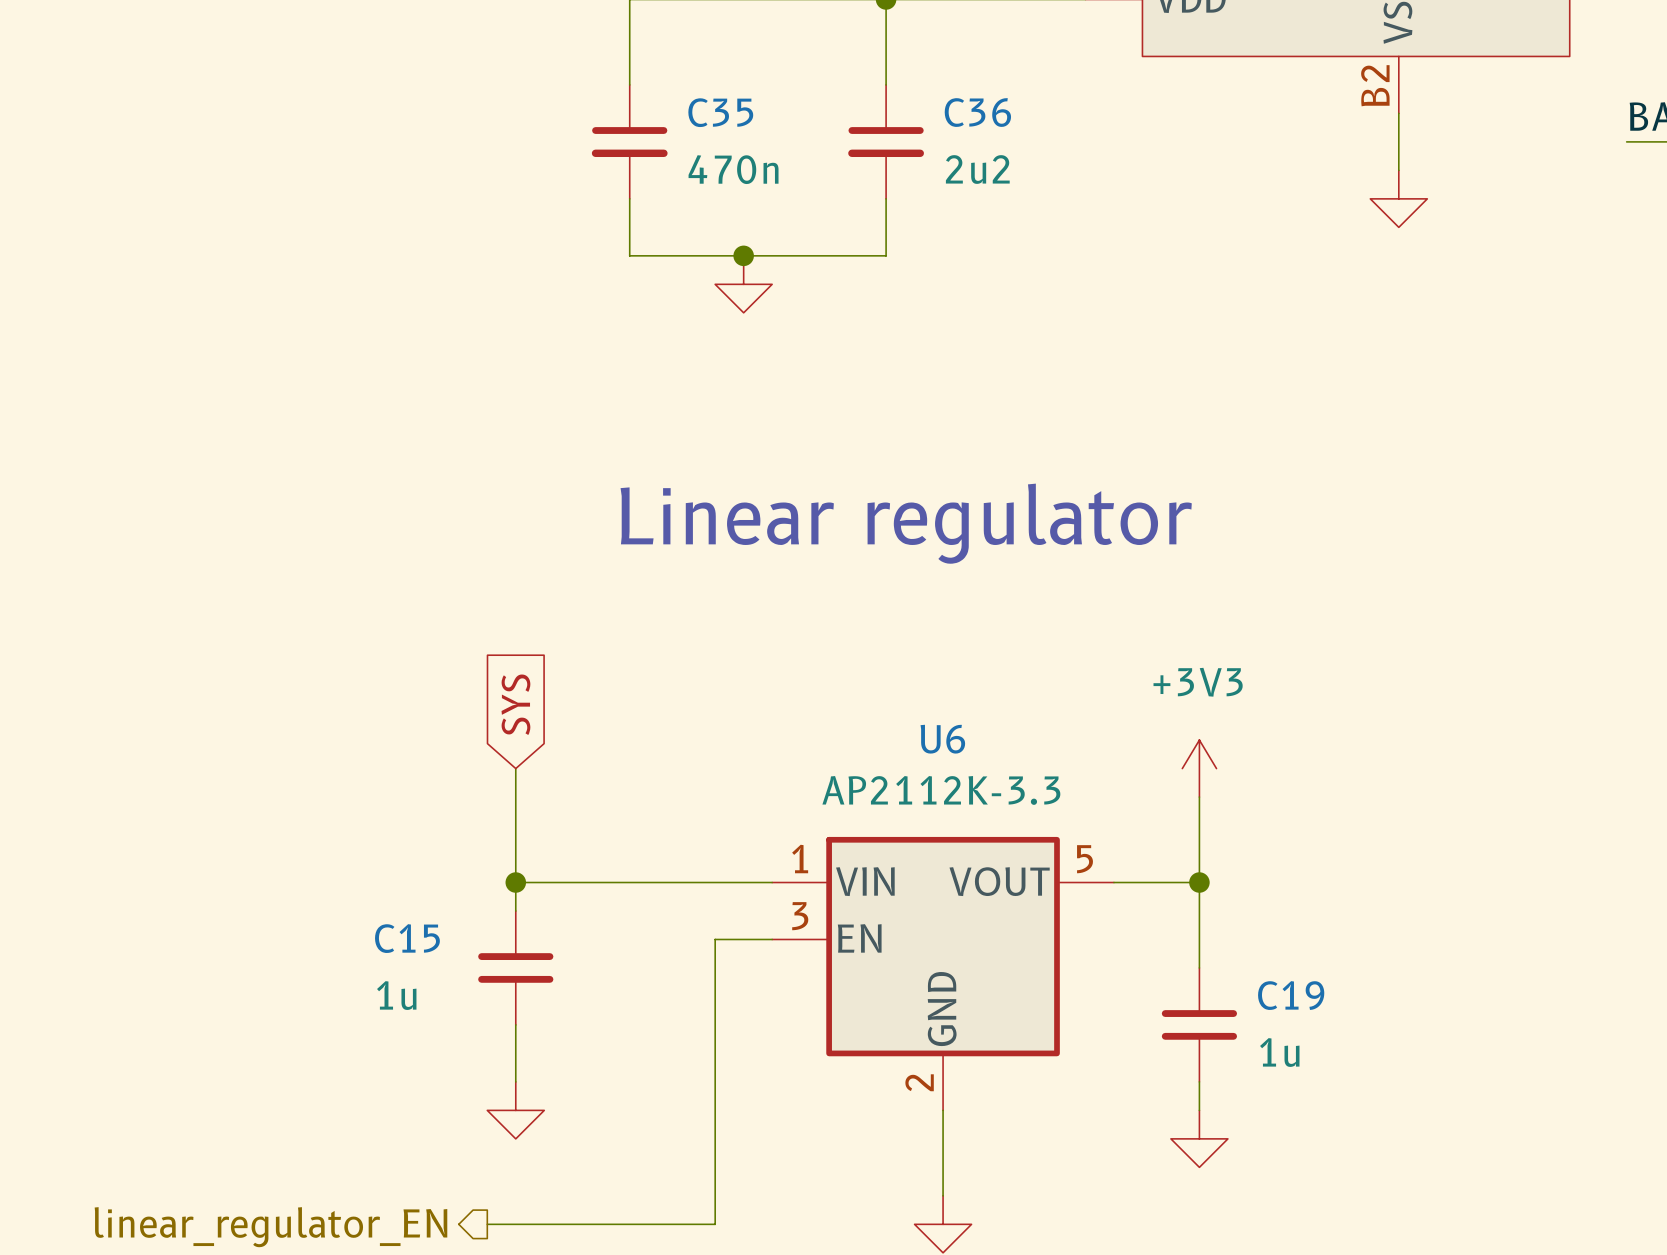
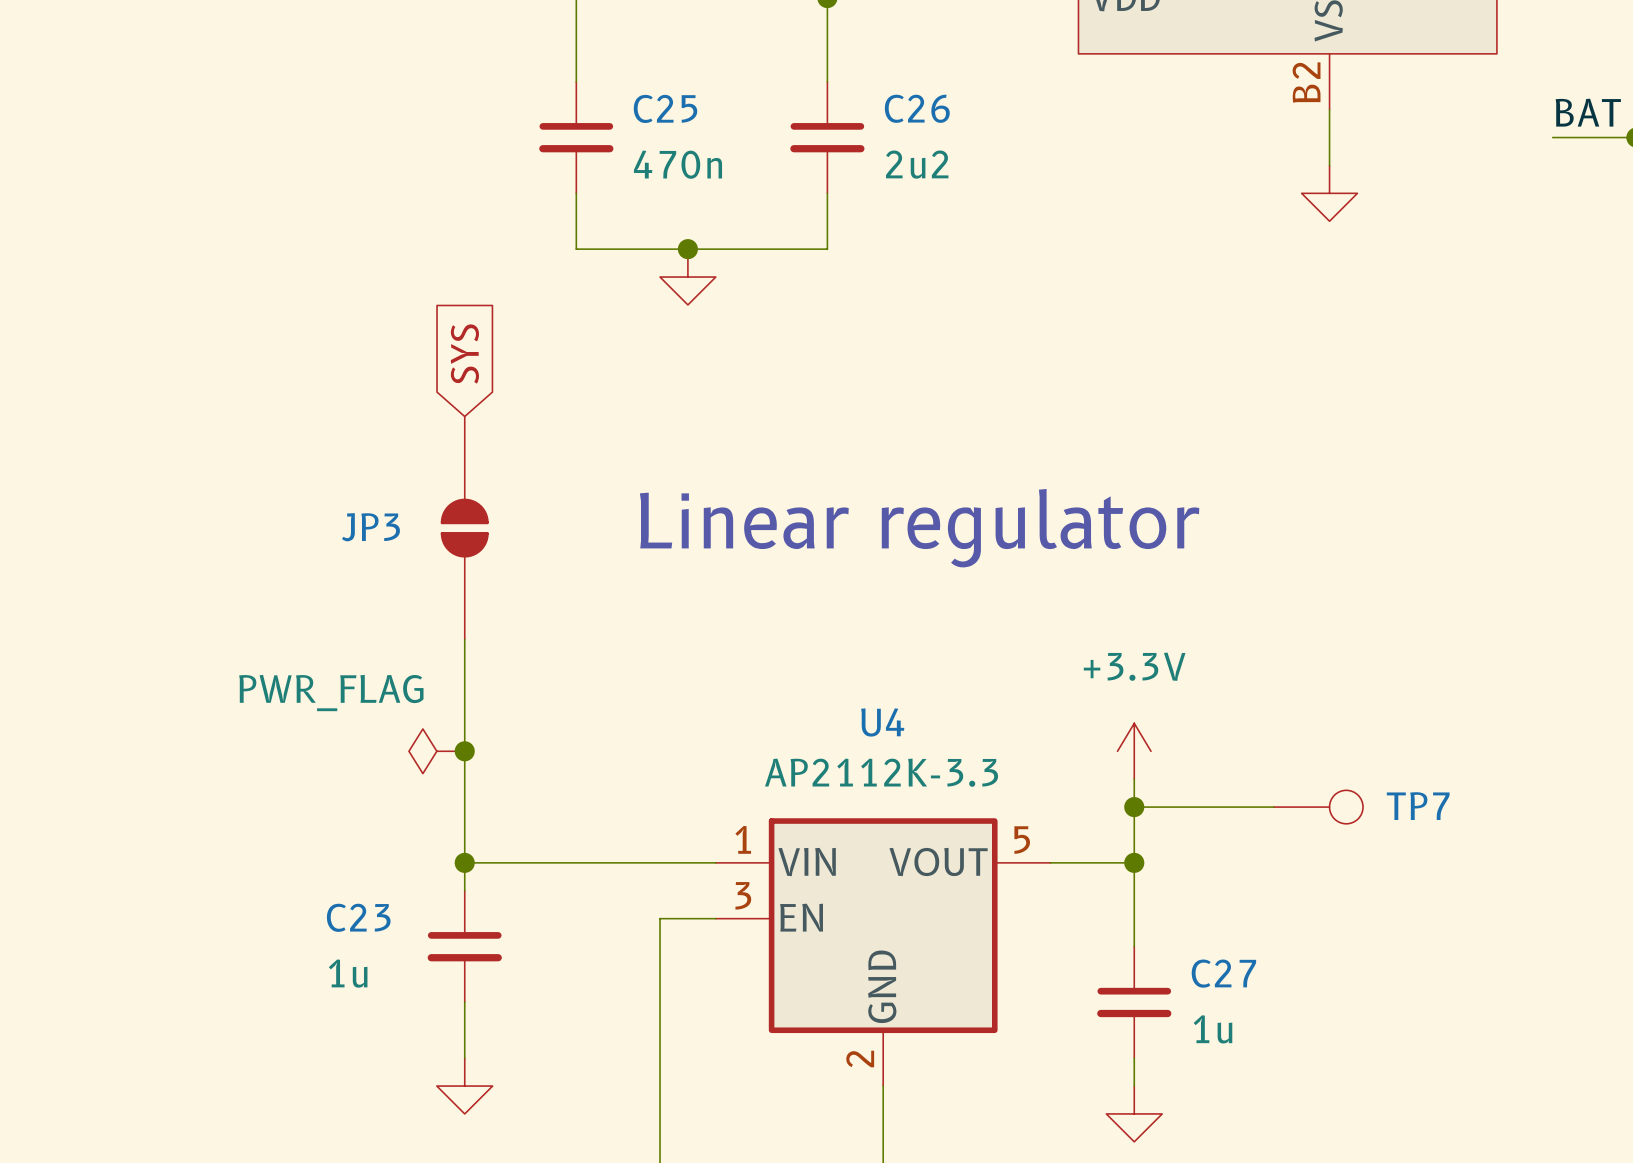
C35 name: C35 (720, 112) -> C25 (665, 108)
C36 name: C36 (977, 112) -> C26 (917, 108)
text position: Linear regulator (906, 523) -> Linear regulator (919, 528)
JP3: none -> (464, 528)
wire: none -> (464, 639) (464, 751)
global label position: SYS (515, 704) -> SYS (464, 354)
U6 name: U6 (942, 739) -> U4 (882, 722)
power symbol: none -> PWR_FLAG (436, 751)
junction: none -> (464, 751)
power symbol: +3V3 (1199, 768) -> +3.3V (1134, 751)
wire: none -> (1134, 807) (1273, 807)
junction: none -> (1134, 807)
TP7: none -> (1318, 807)
C15: 1u (515, 967) -> none
C23: none -> 1u (464, 946)
C19: 1u (1199, 1024) -> none
C27: none -> 1u (1134, 1002)

